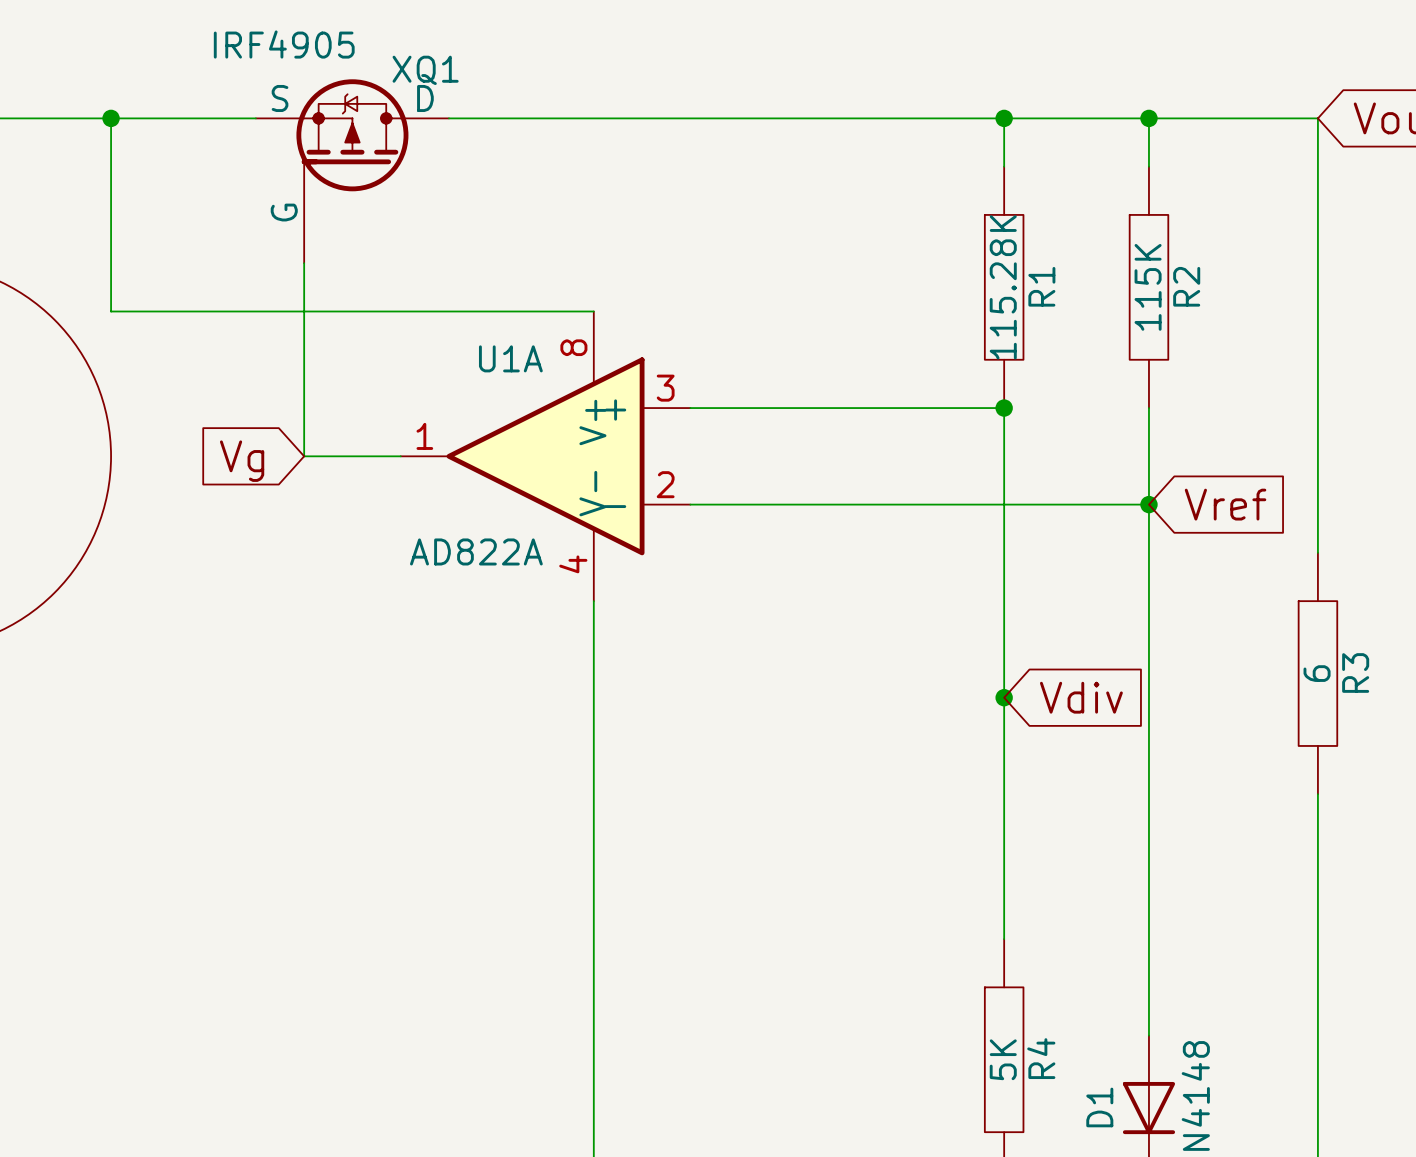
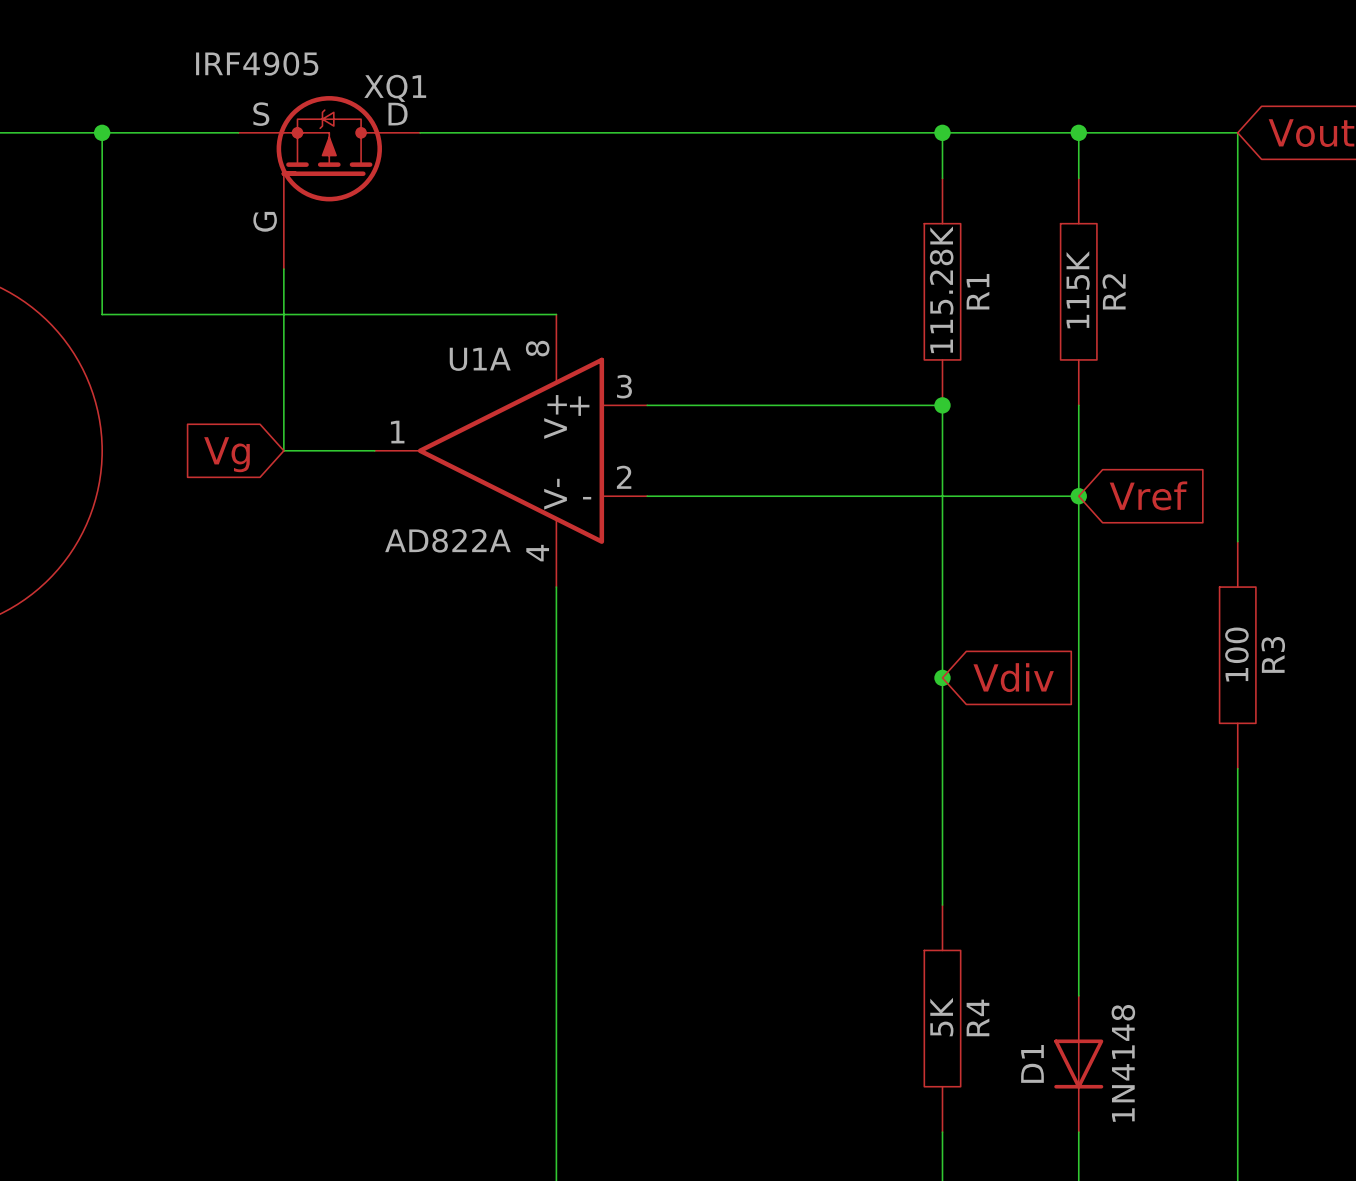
R3 value: 6 (1317, 673) -> 100 (1236, 654)

